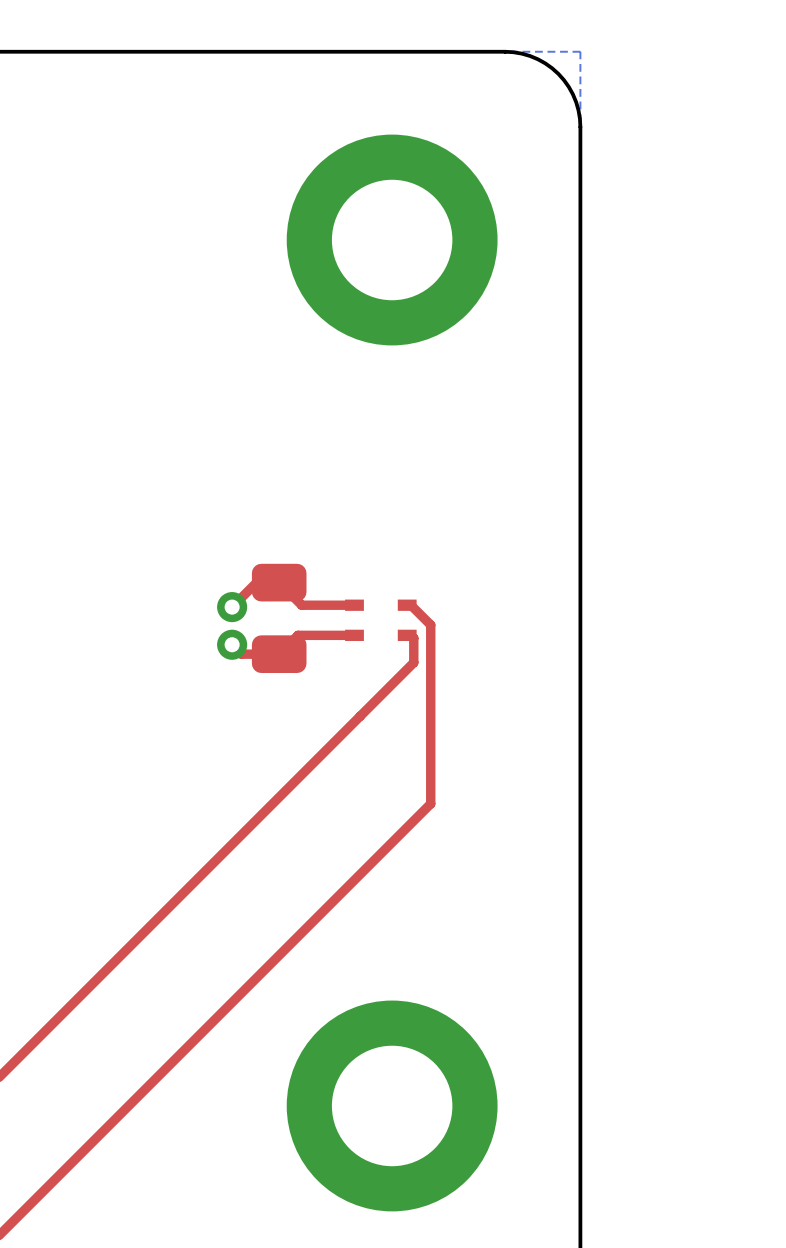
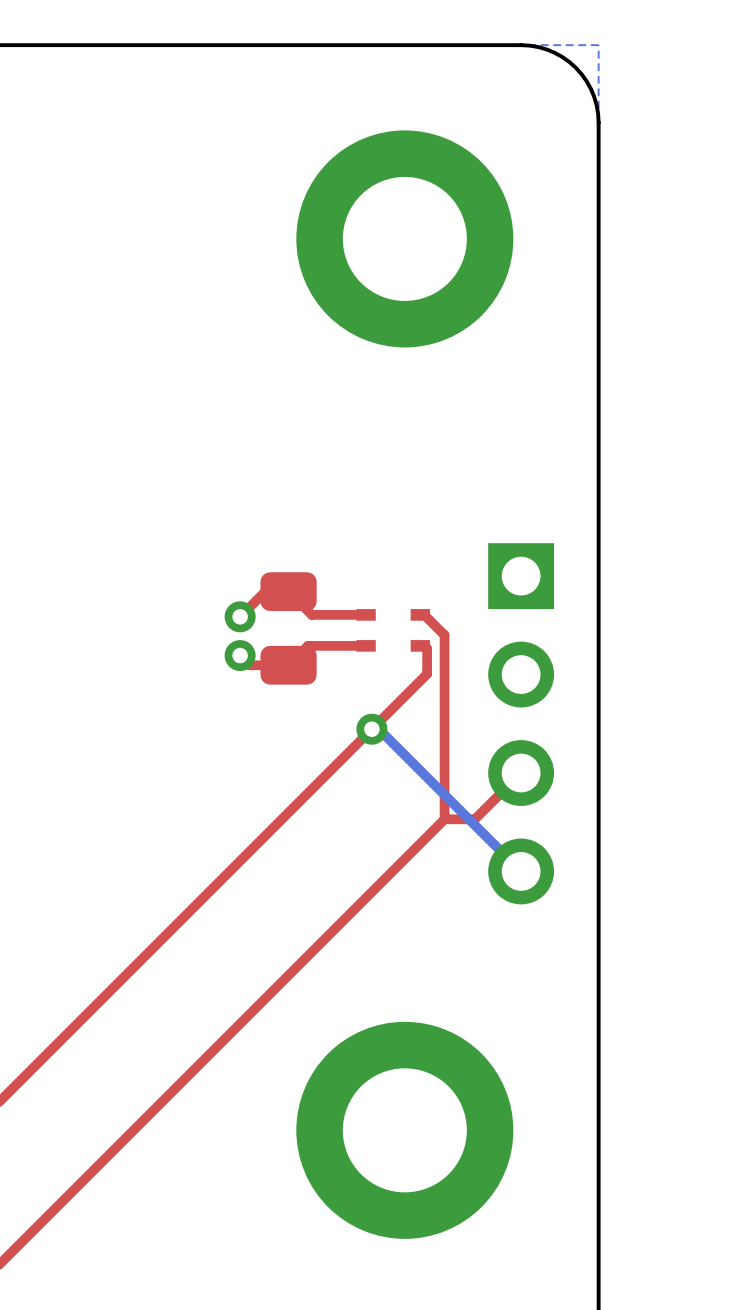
part: none -> (521, 723)
bottom track: none -> (371, 729) (378, 729) (521, 871)
via: none -> (371, 729)
top track: none -> (521, 773) (474, 819) (444, 819)

